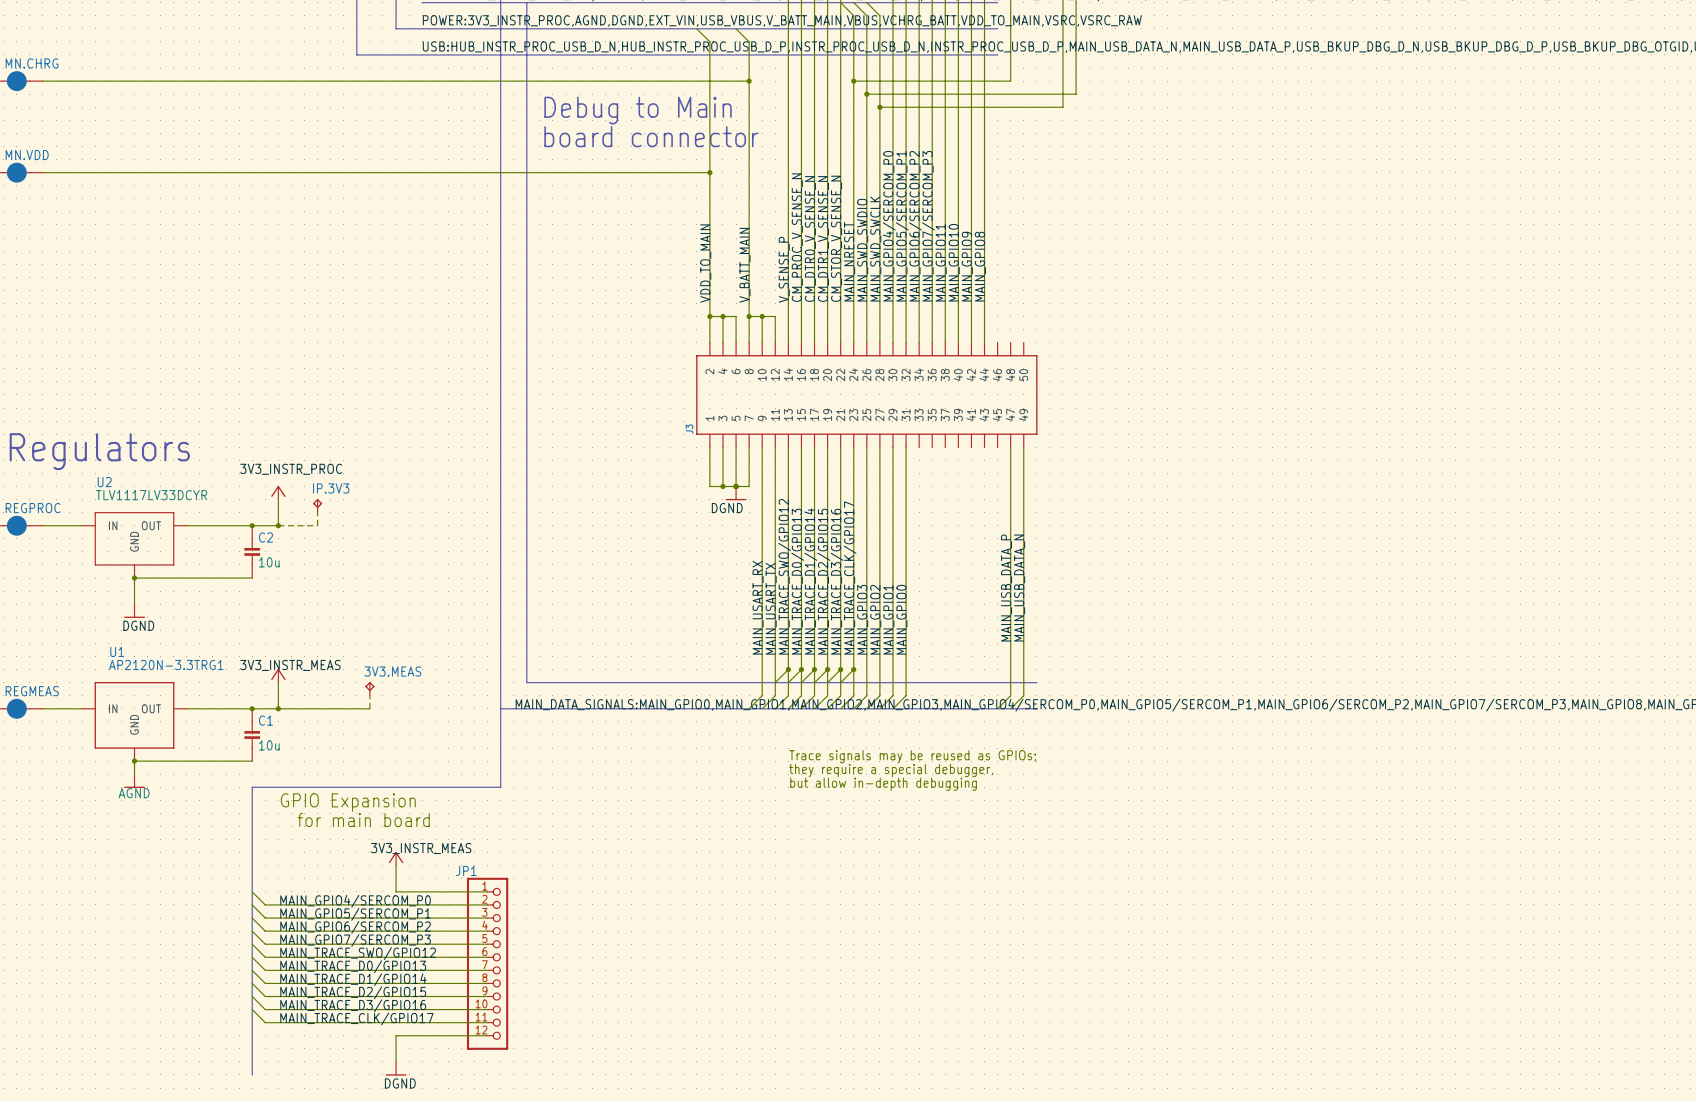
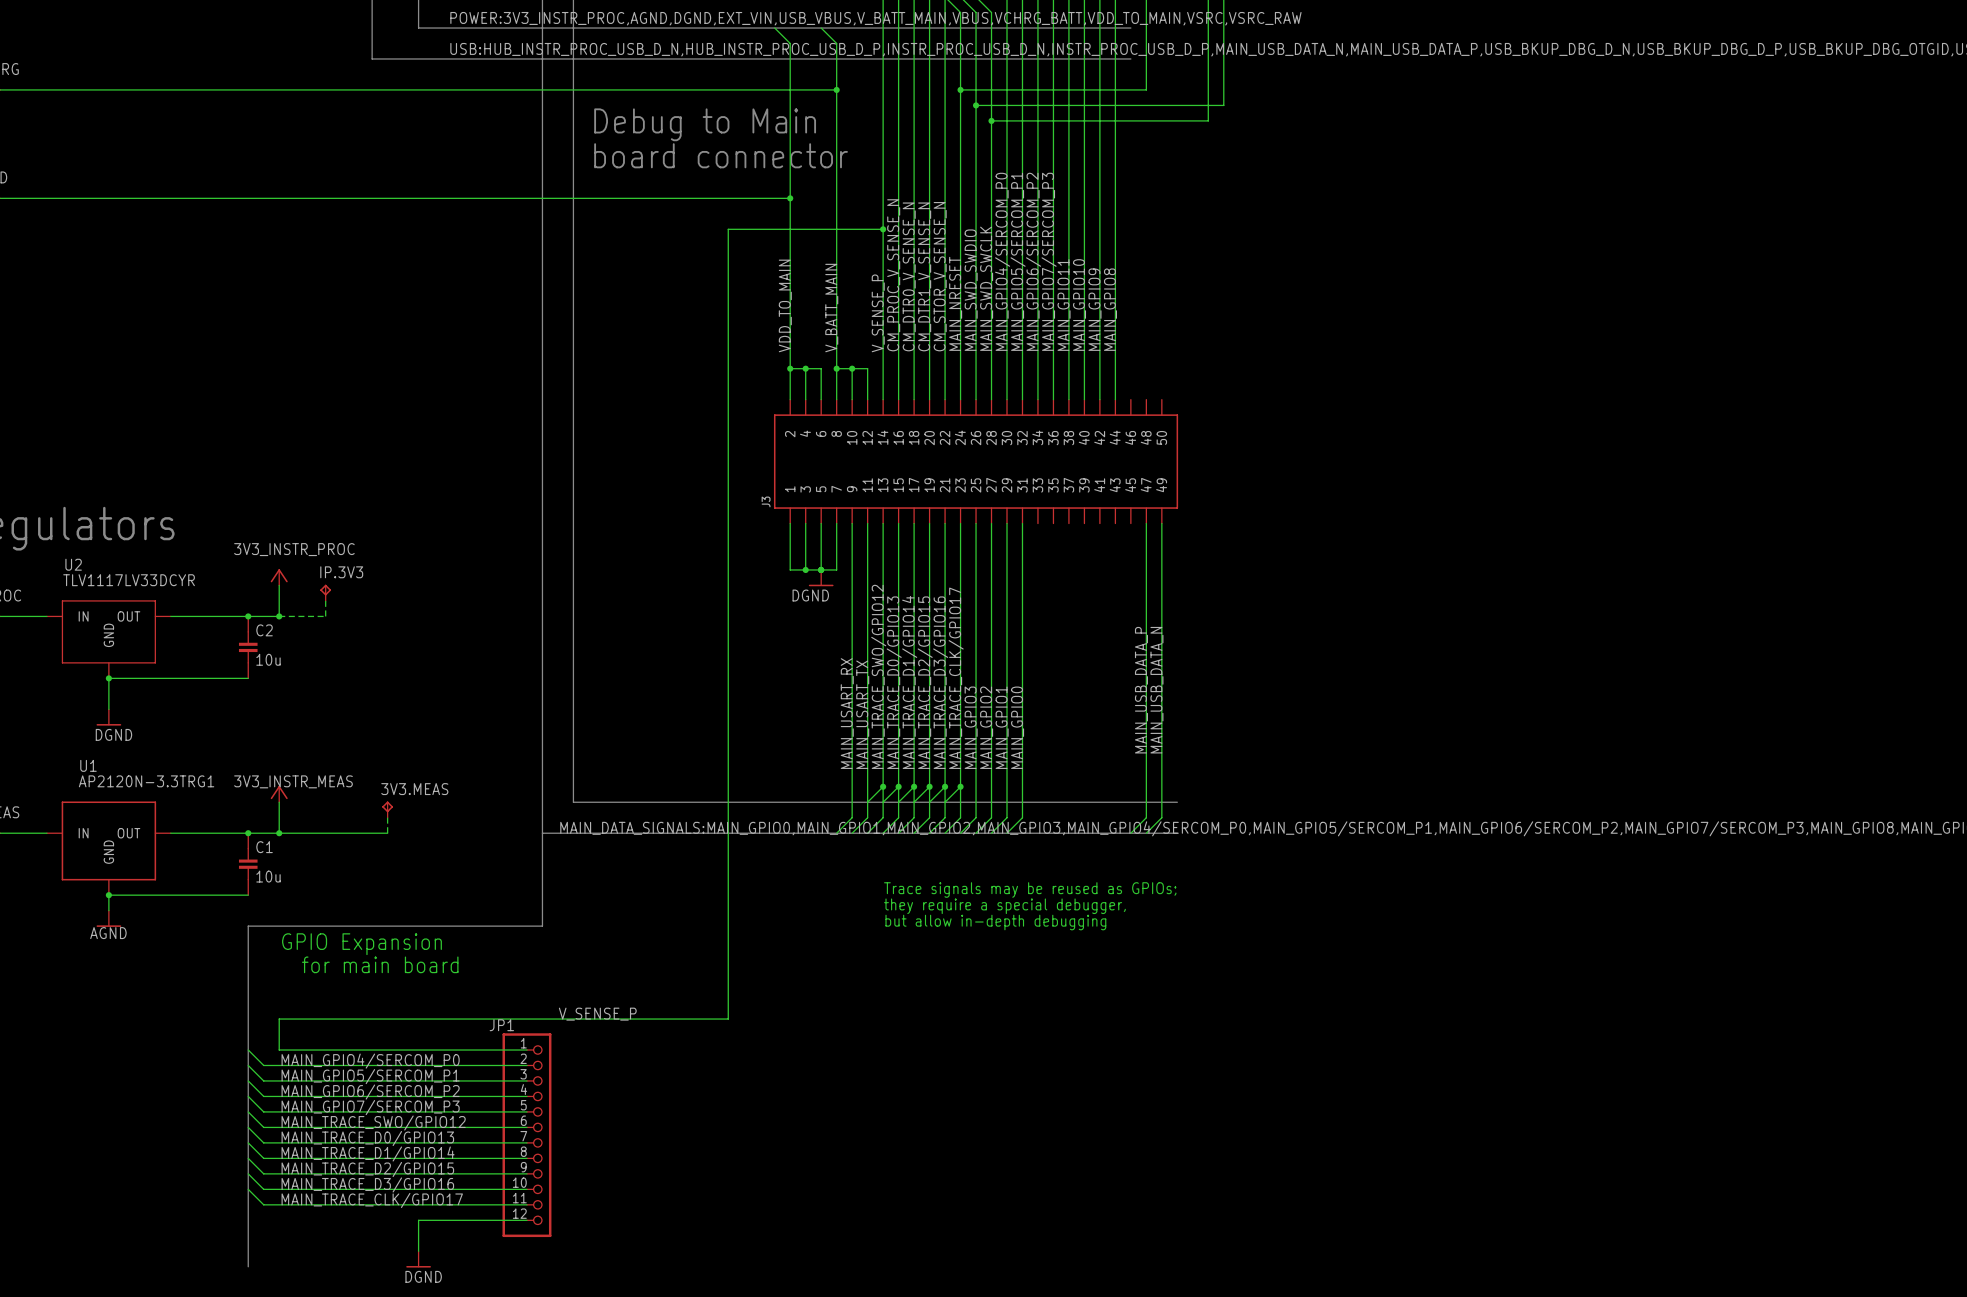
junction: none -> (883, 229)
label: 3V3_INSTR_MEAS (421, 848) -> none
power symbol: (396, 858) -> none
label: none -> V_SENSE_P (597, 1014)
wire: (396, 865) (396, 891) -> (883, 229) (728, 229) (728, 1019) (279, 1019) (279, 1050) (418, 1050)

